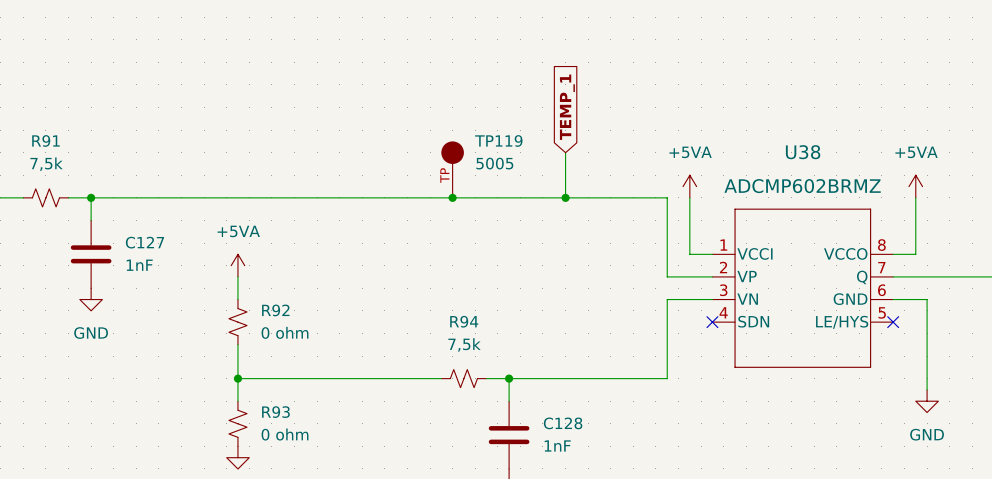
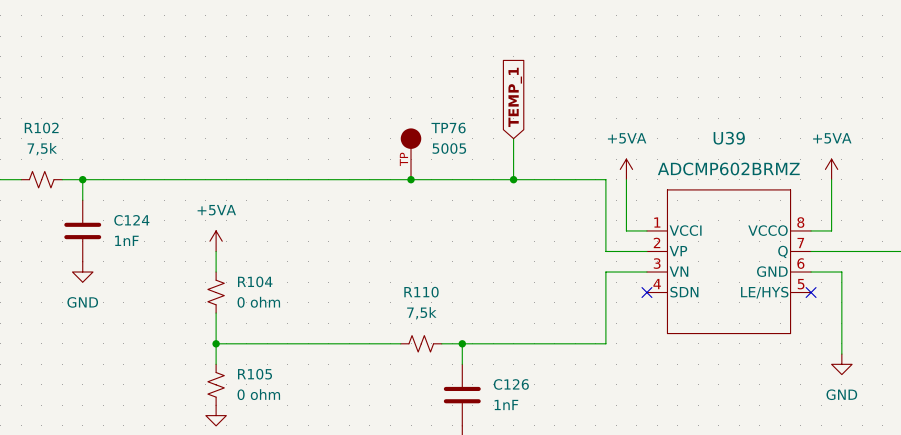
R91 name: R91 (45, 140) -> R102 (41, 128)
TP119 name: TP119 (498, 140) -> TP76 (448, 128)
U38 name: U38 (803, 152) -> U39 (729, 138)
C127 name: C127 (144, 242) -> C124 (131, 220)
R92 name: R92 (275, 310) -> R104 (255, 281)
R94 name: R94 (464, 321) -> R110 (421, 292)
R93 name: R93 (275, 412) -> R105 (255, 374)
C128 name: C128 (563, 423) -> C126 (511, 384)

